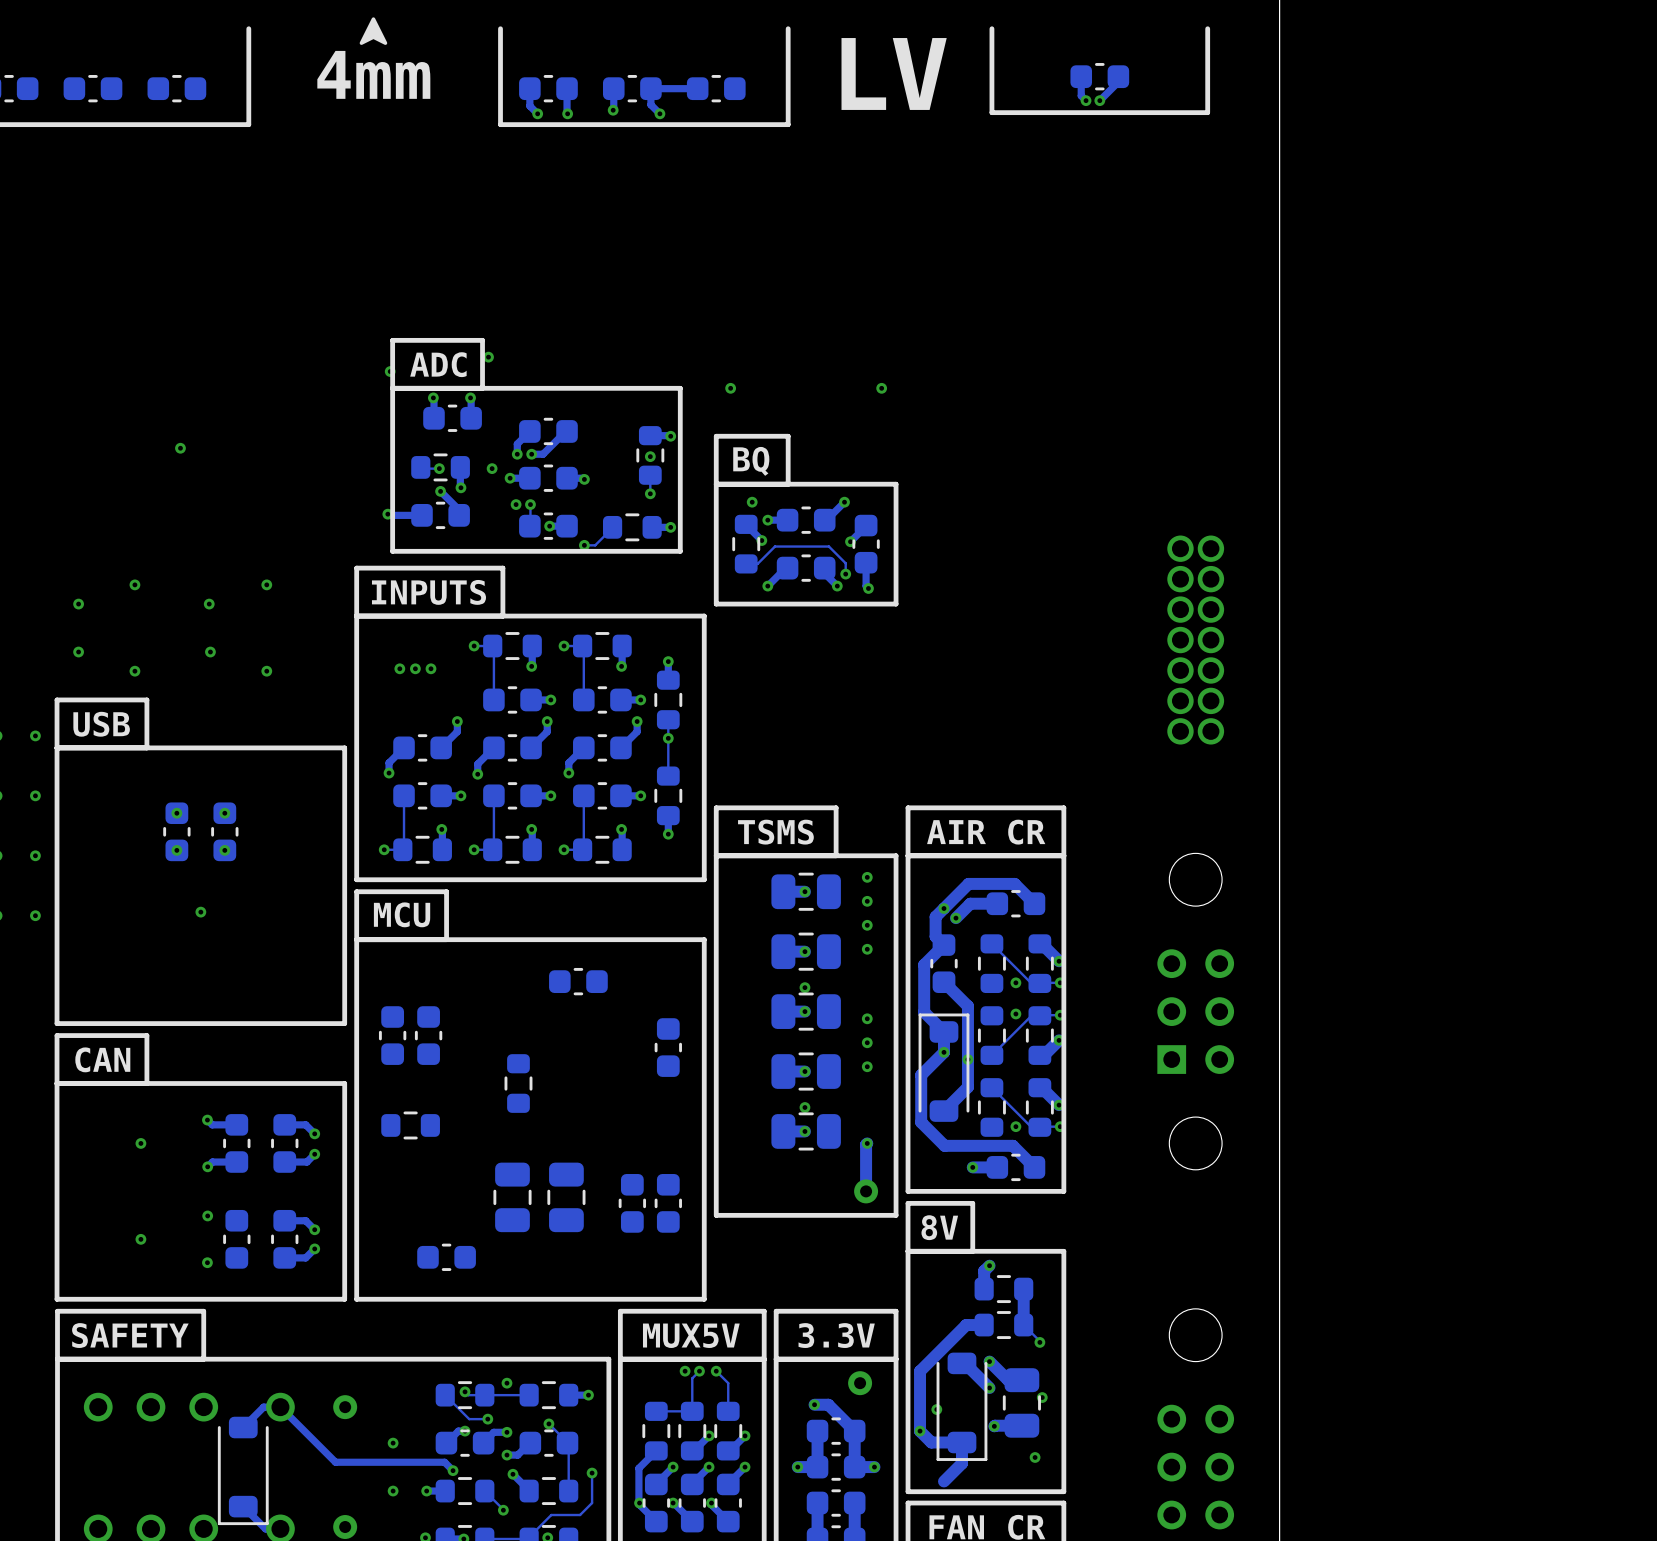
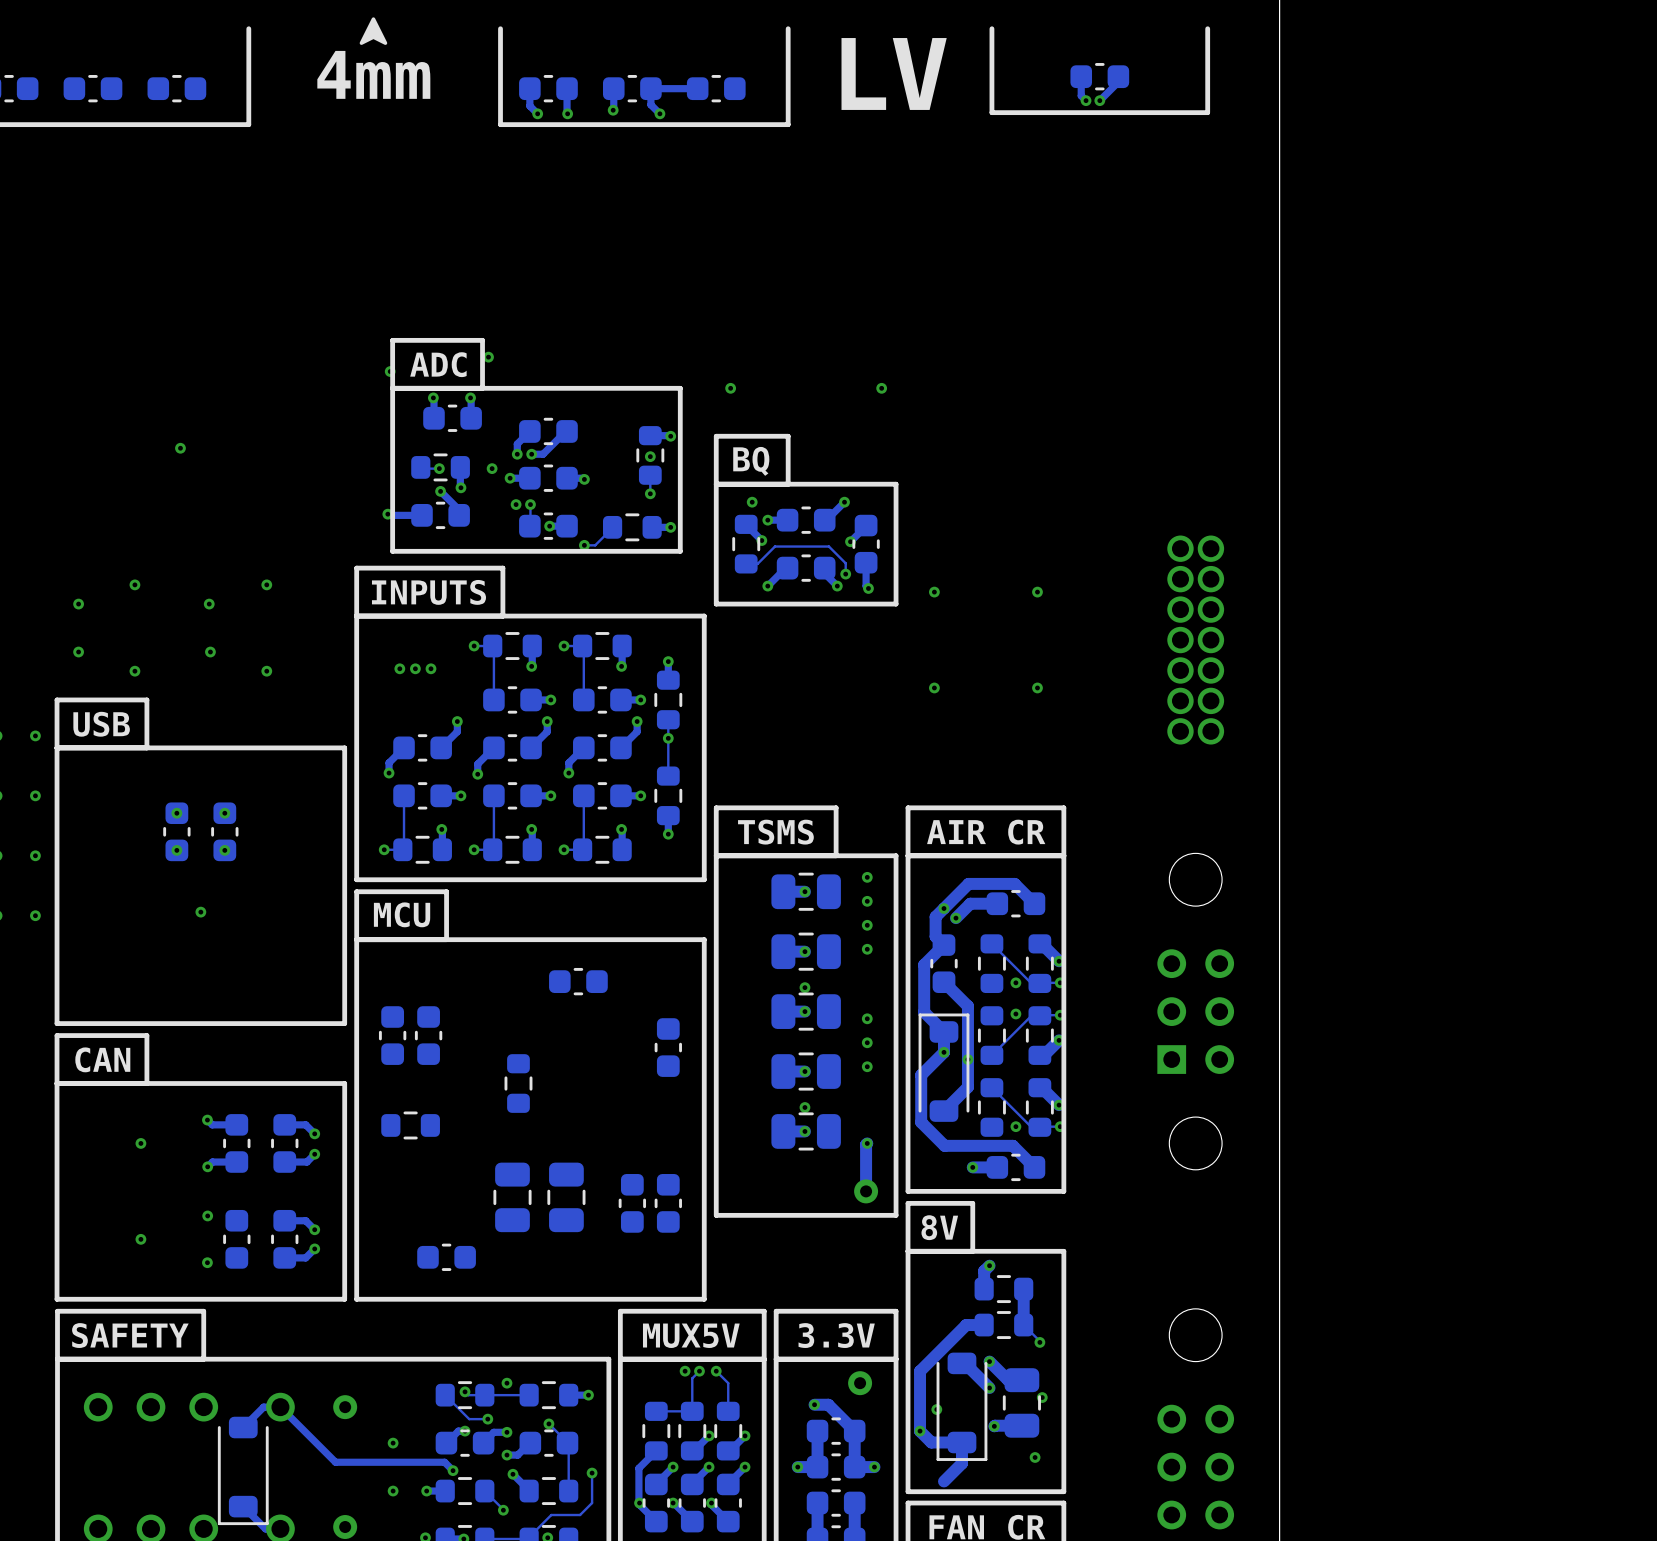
via: none -> (934, 592)
via: none -> (1037, 592)
via: none -> (934, 687)
via: none -> (1037, 687)

